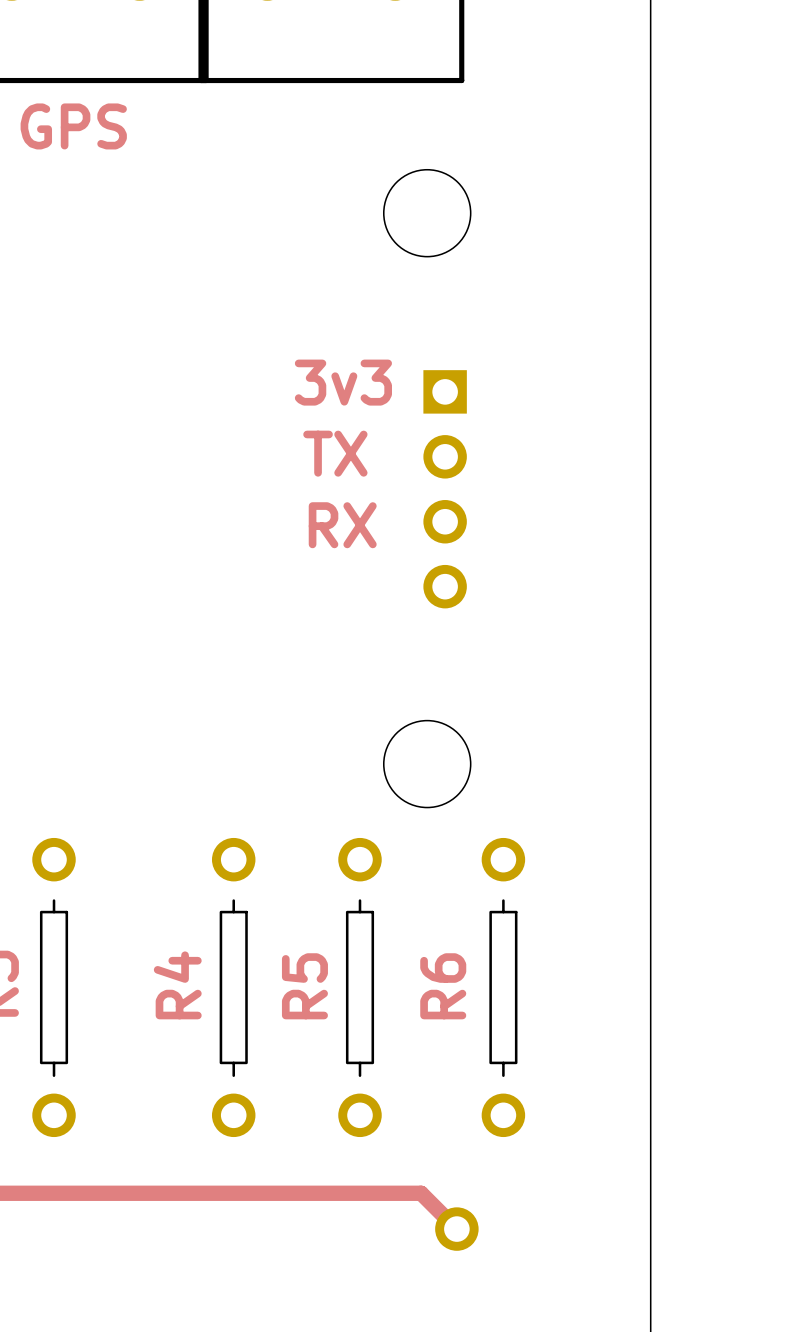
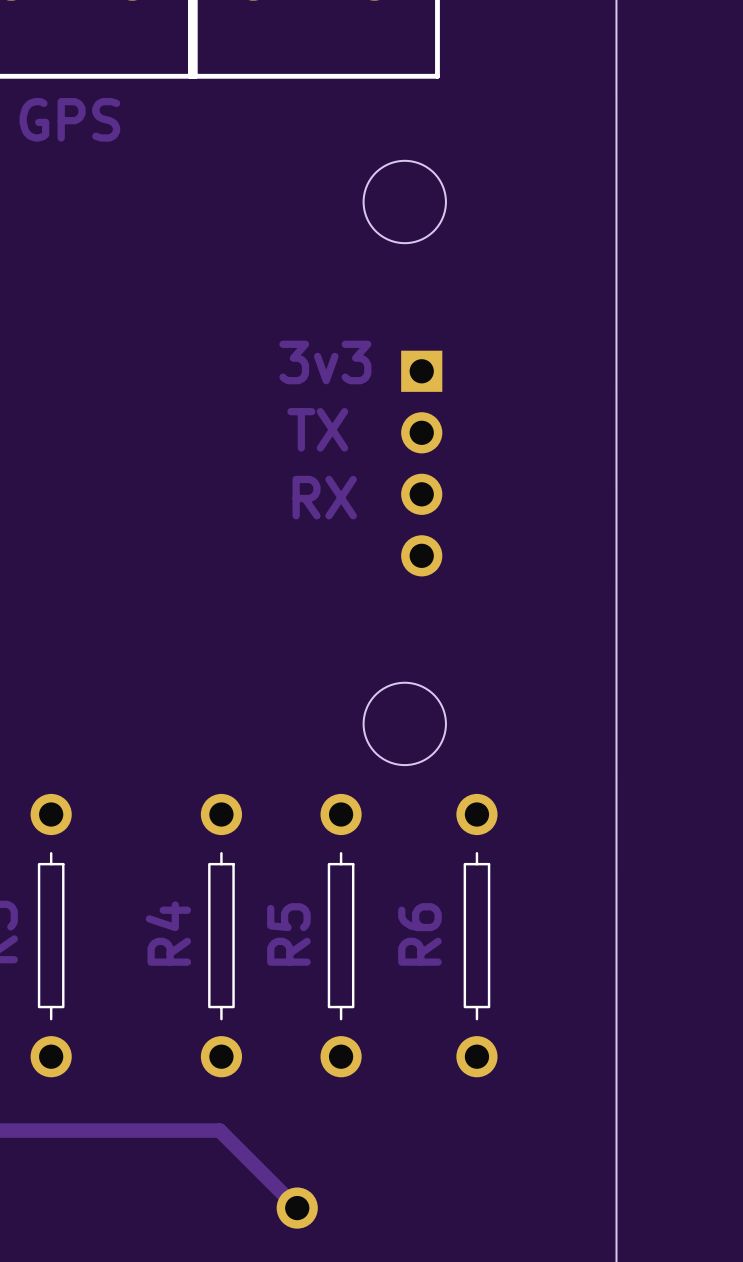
track: (231, 1193) (421, 1193) (456, 1229) -> (219, 1130) (297, 1208)
part position: (456, 1229) -> (297, 1208)

